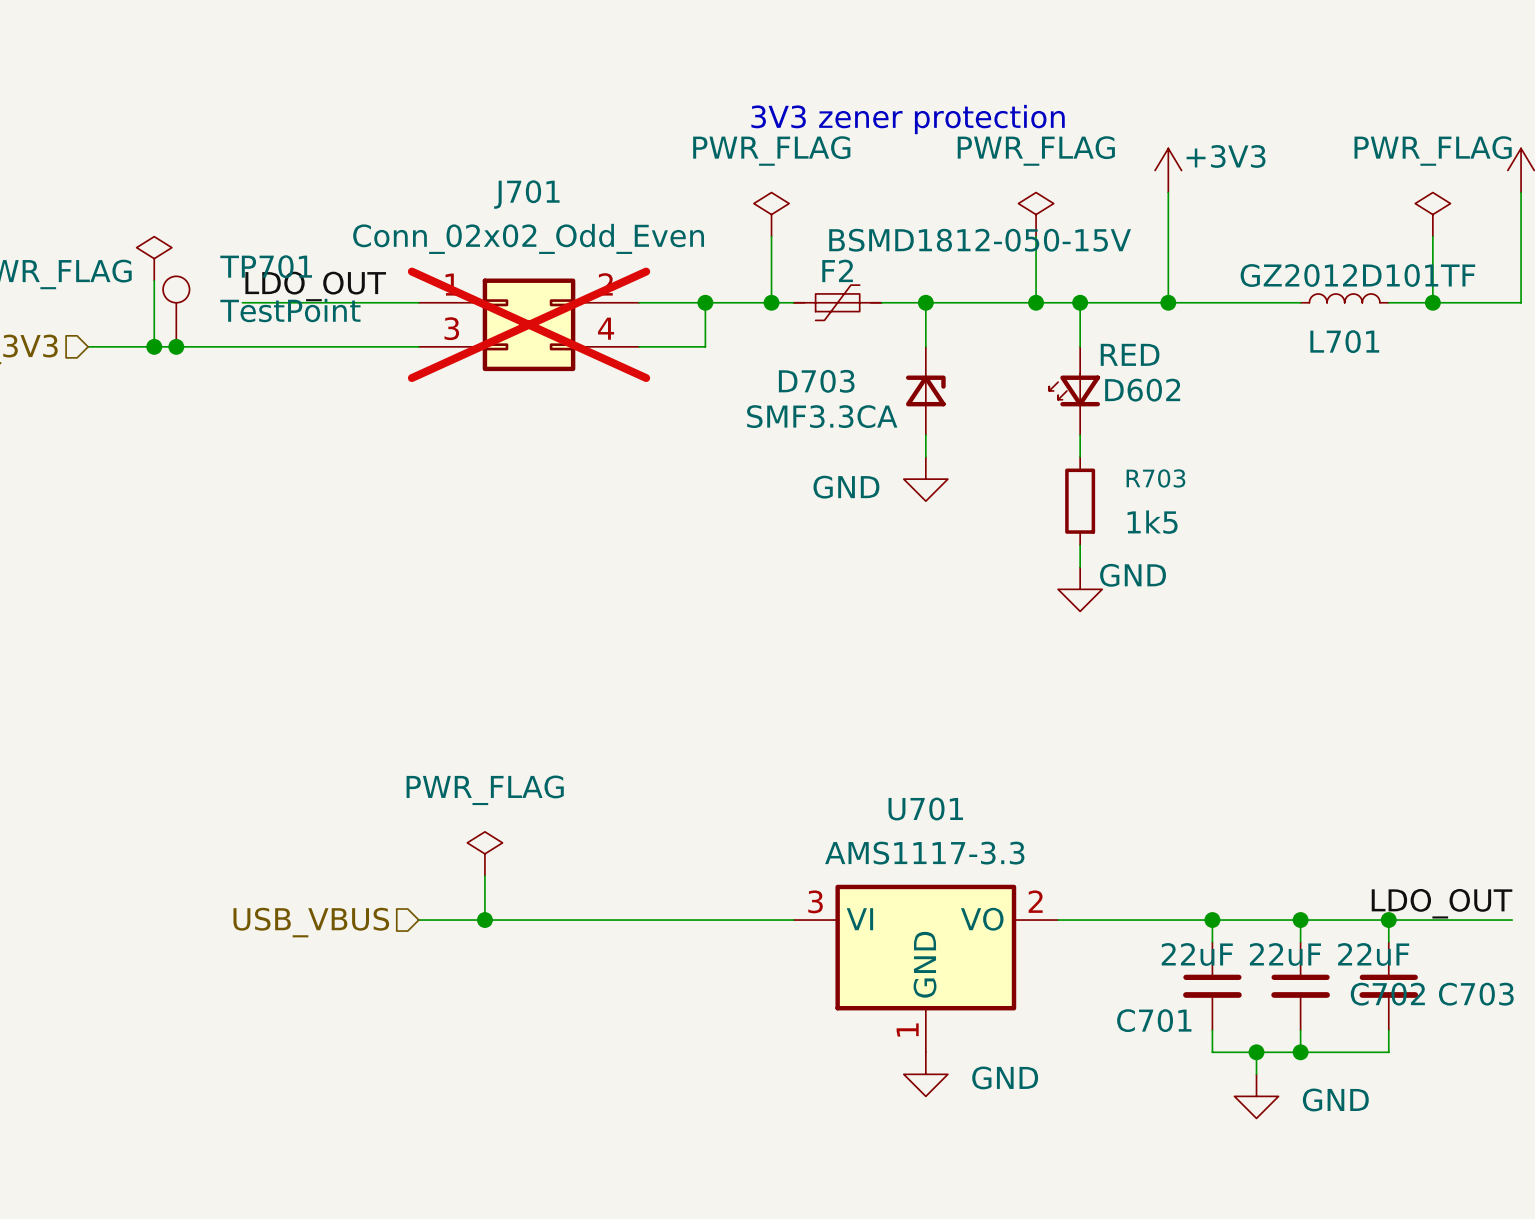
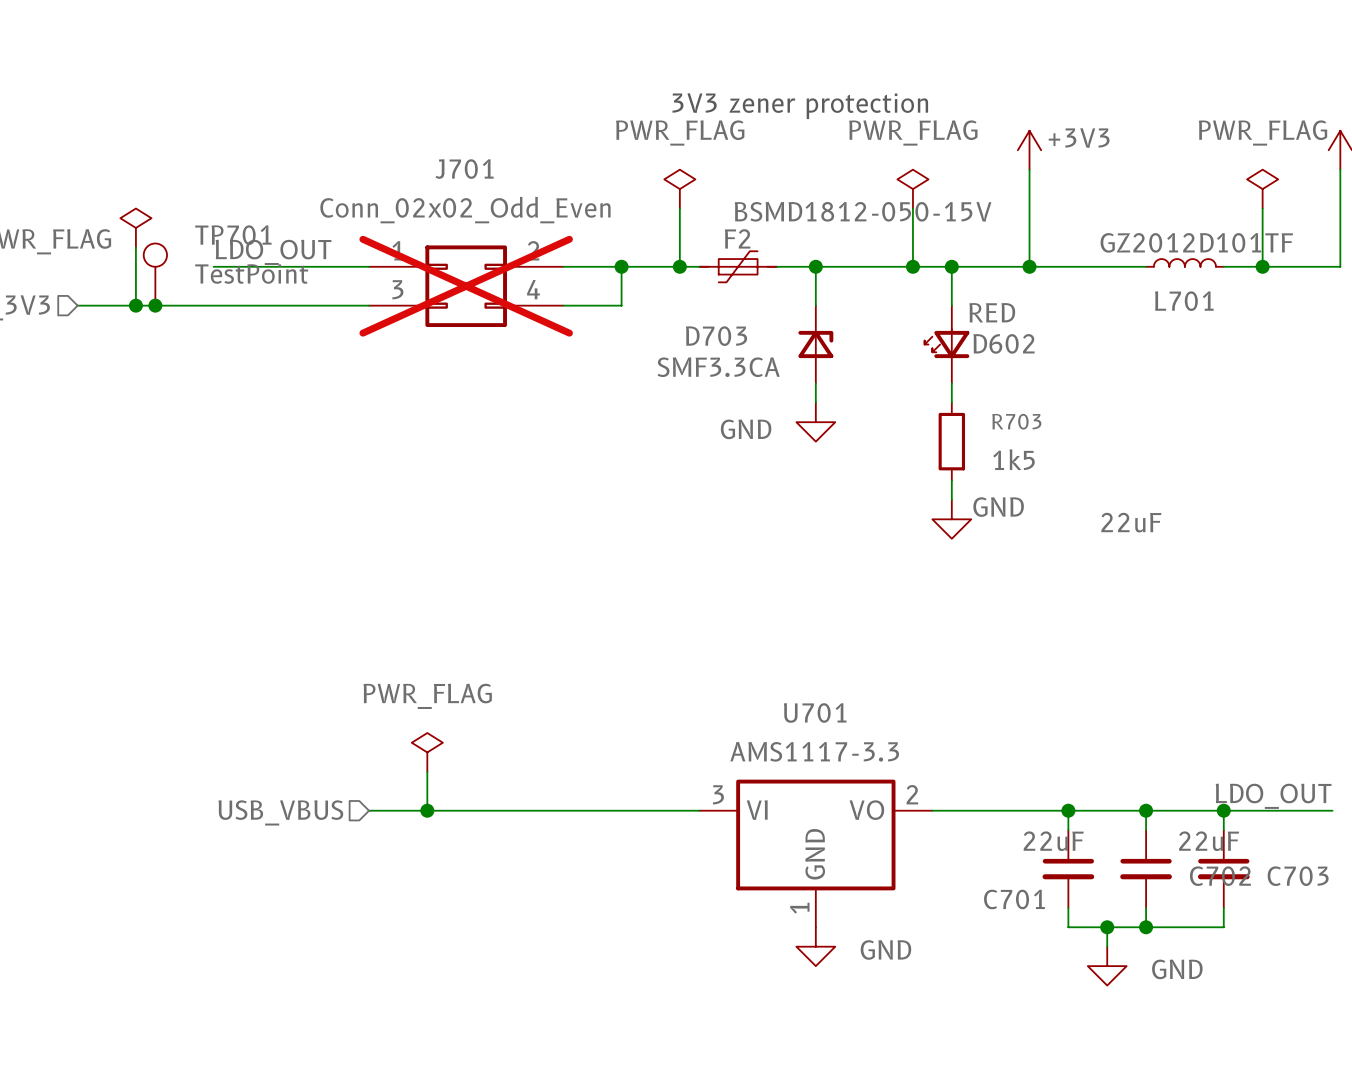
C702 value position: 22uF (1285, 954) -> 22uF (1131, 522)

